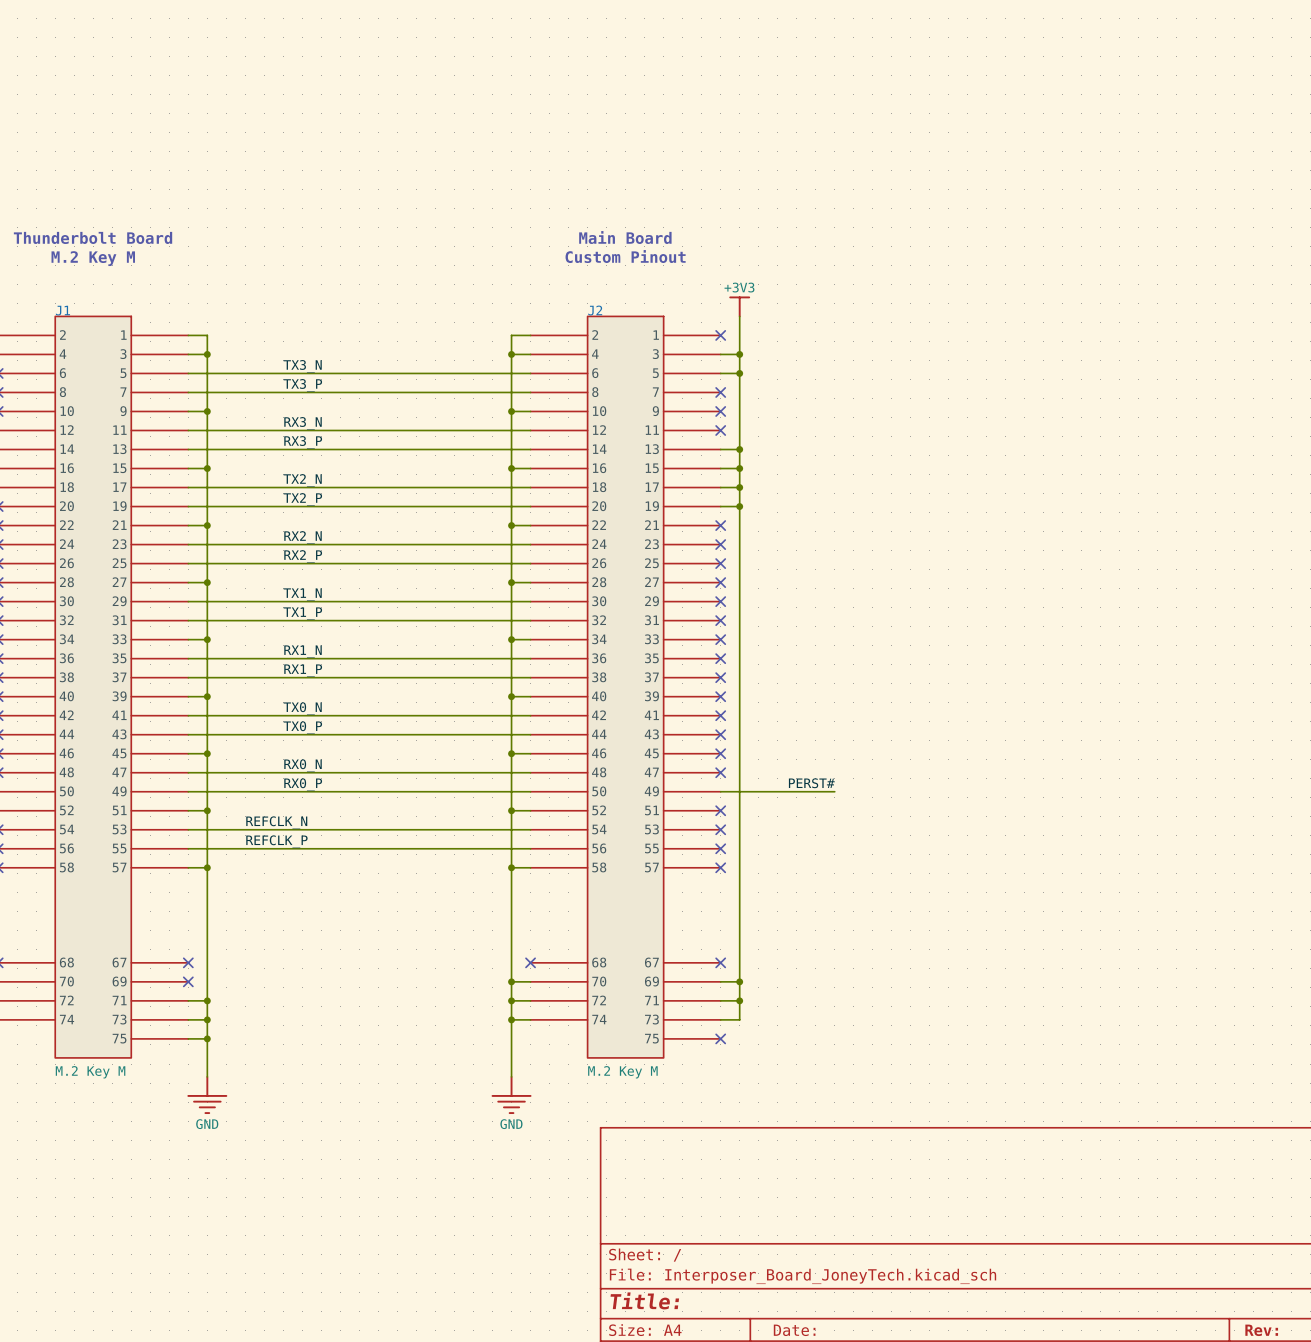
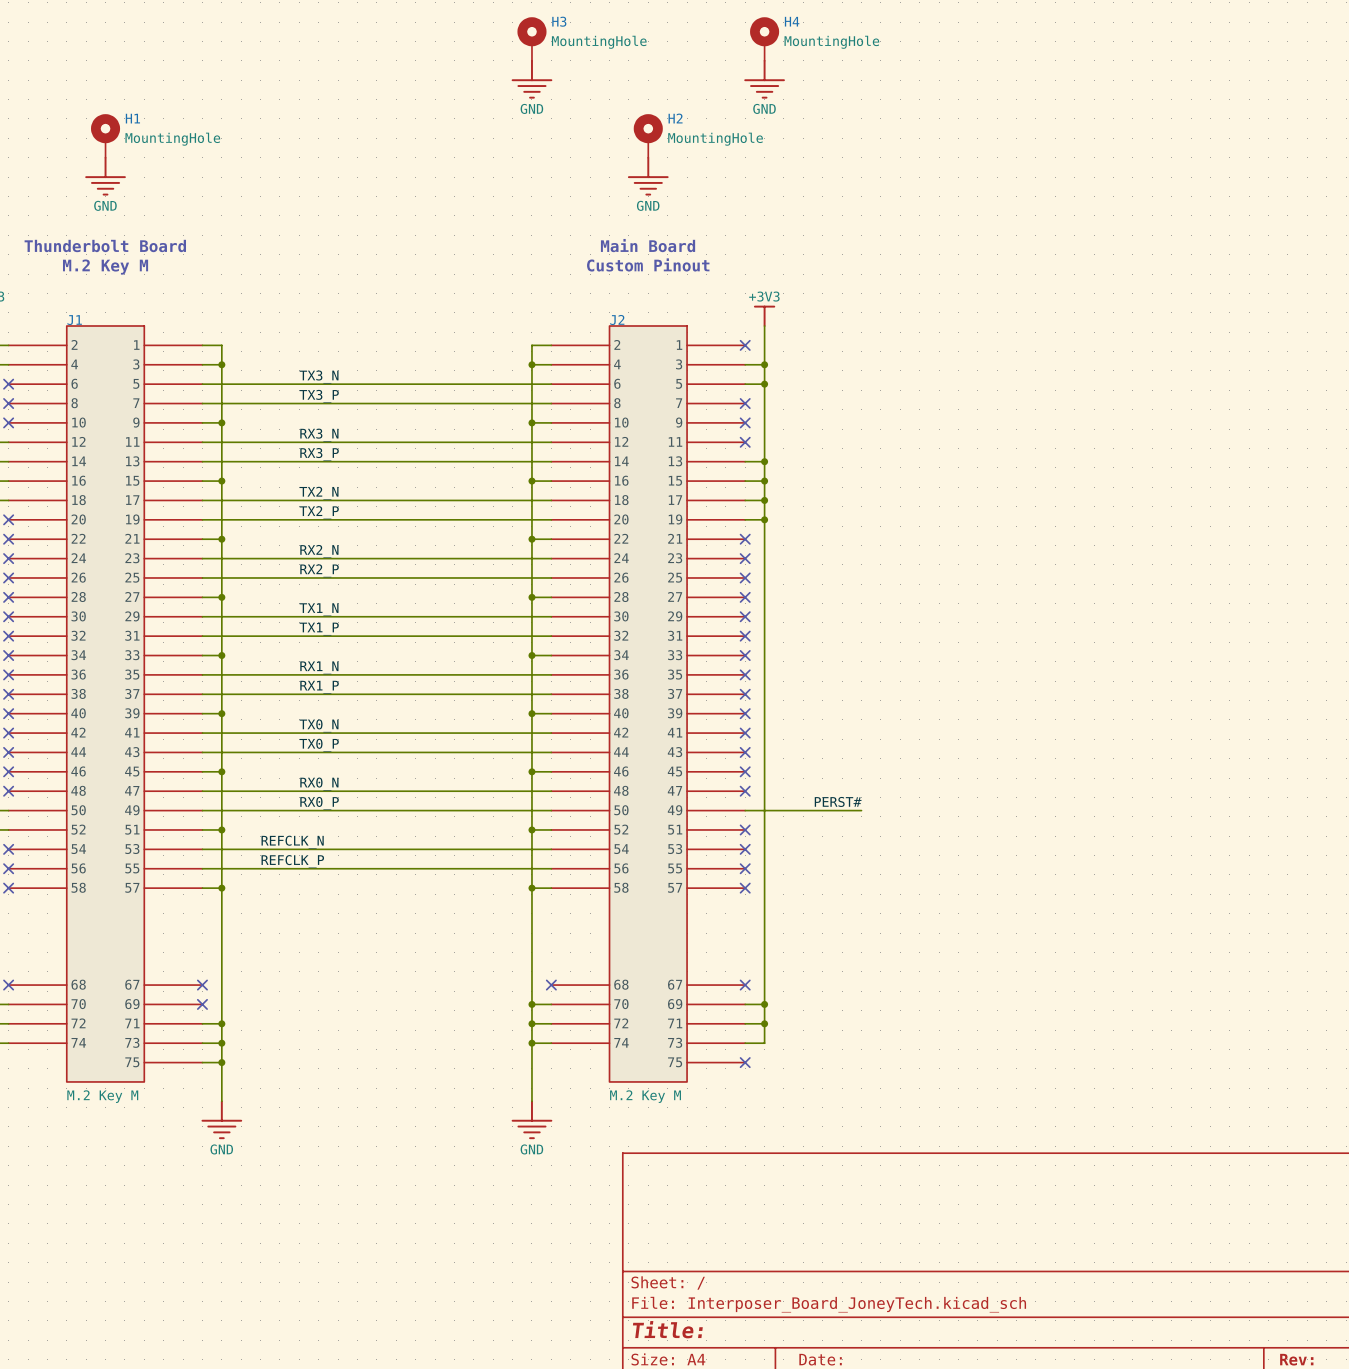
H3: none -> MountingHole (531, 39)
H4: none -> MountingHole (764, 39)
power symbol: none -> GND (531, 79)
power symbol: none -> GND (764, 79)
H1: none -> MountingHole (105, 135)
H2: none -> MountingHole (648, 135)
power symbol: none -> GND (105, 176)
power symbol: none -> GND (648, 176)

